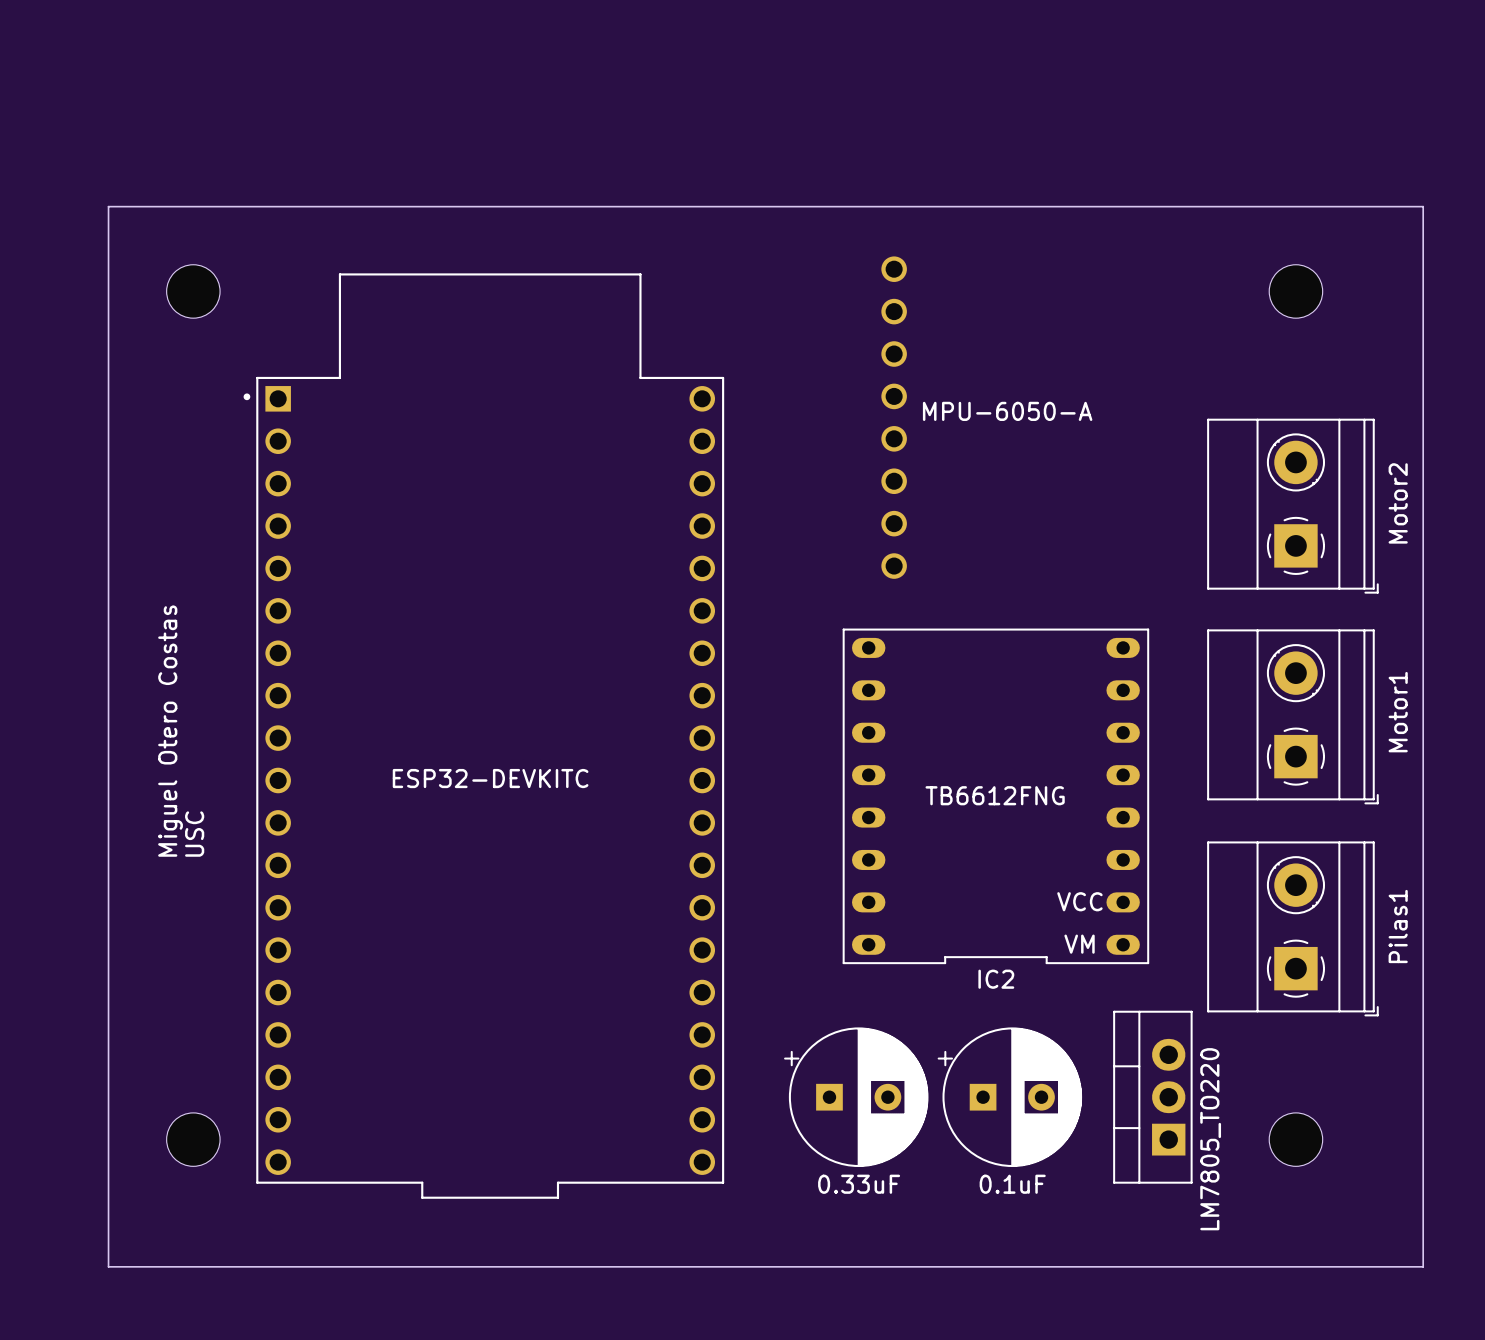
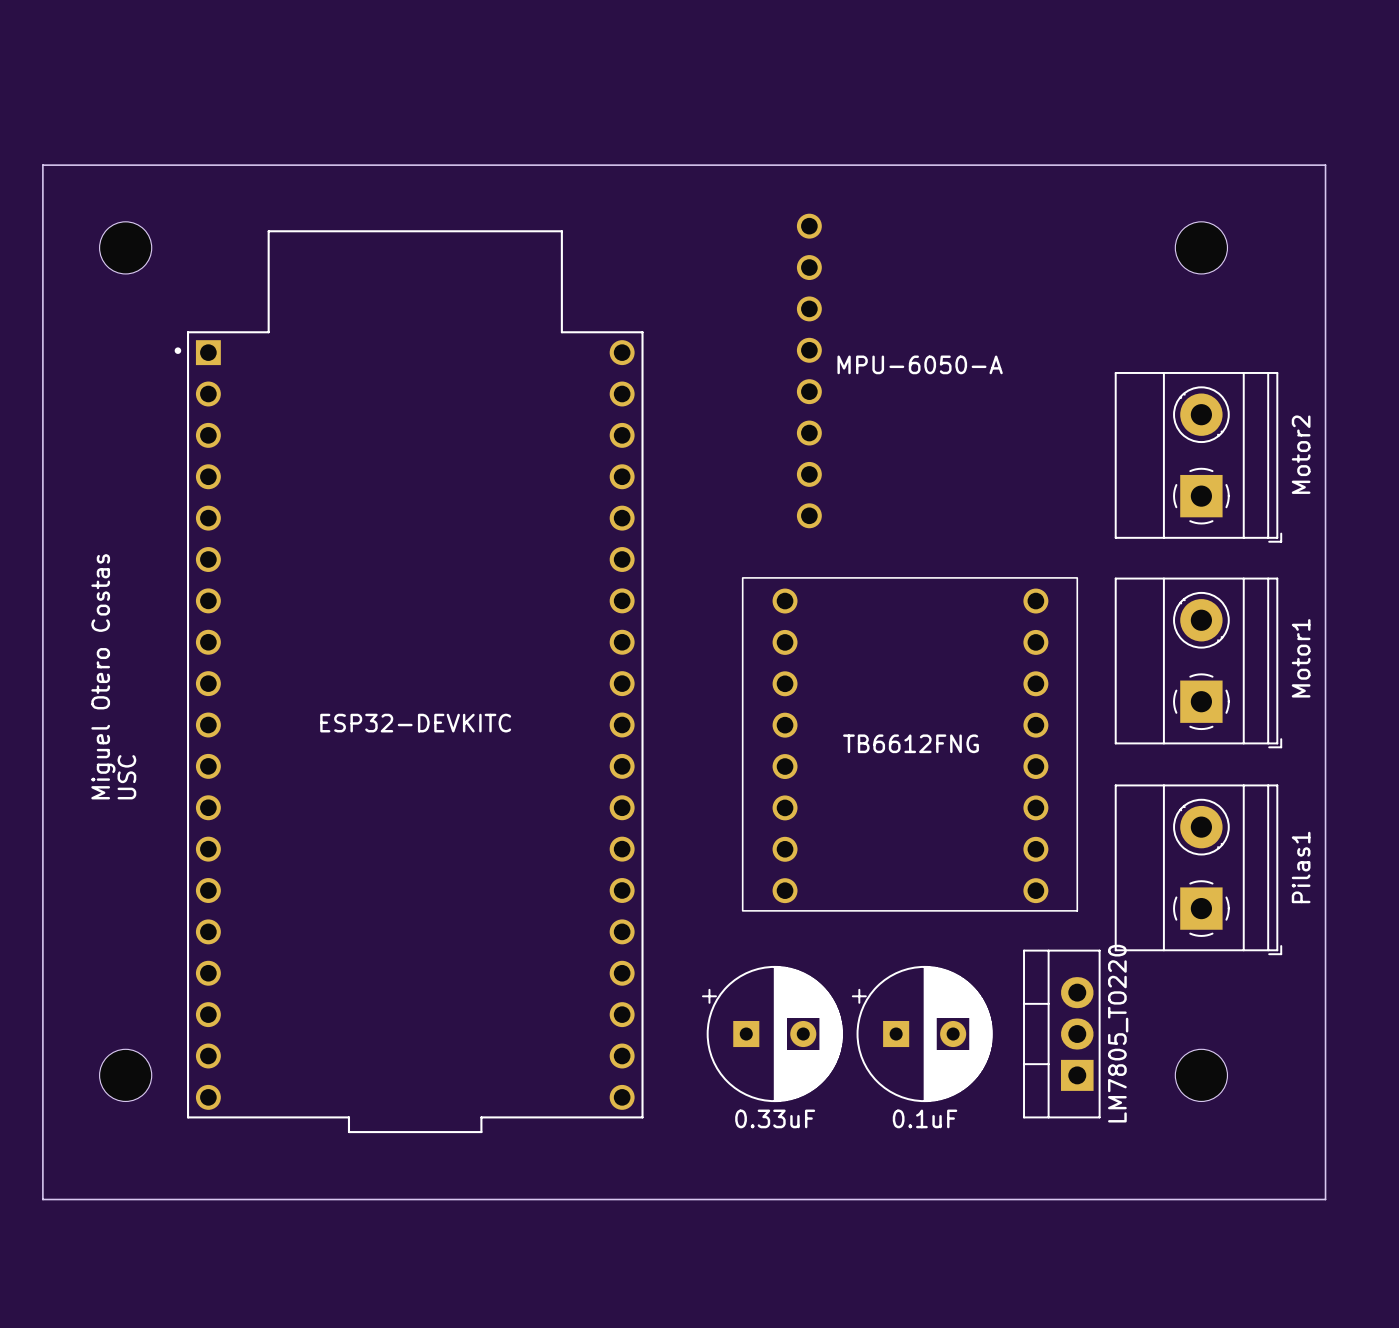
IC2: TB6612FNG (995, 796) -> none
part: none -> TB6612FNG (909, 744)
part value position: LM7805_TO220 (1210, 1139) -> LM7805_TO220 (1118, 1033)

